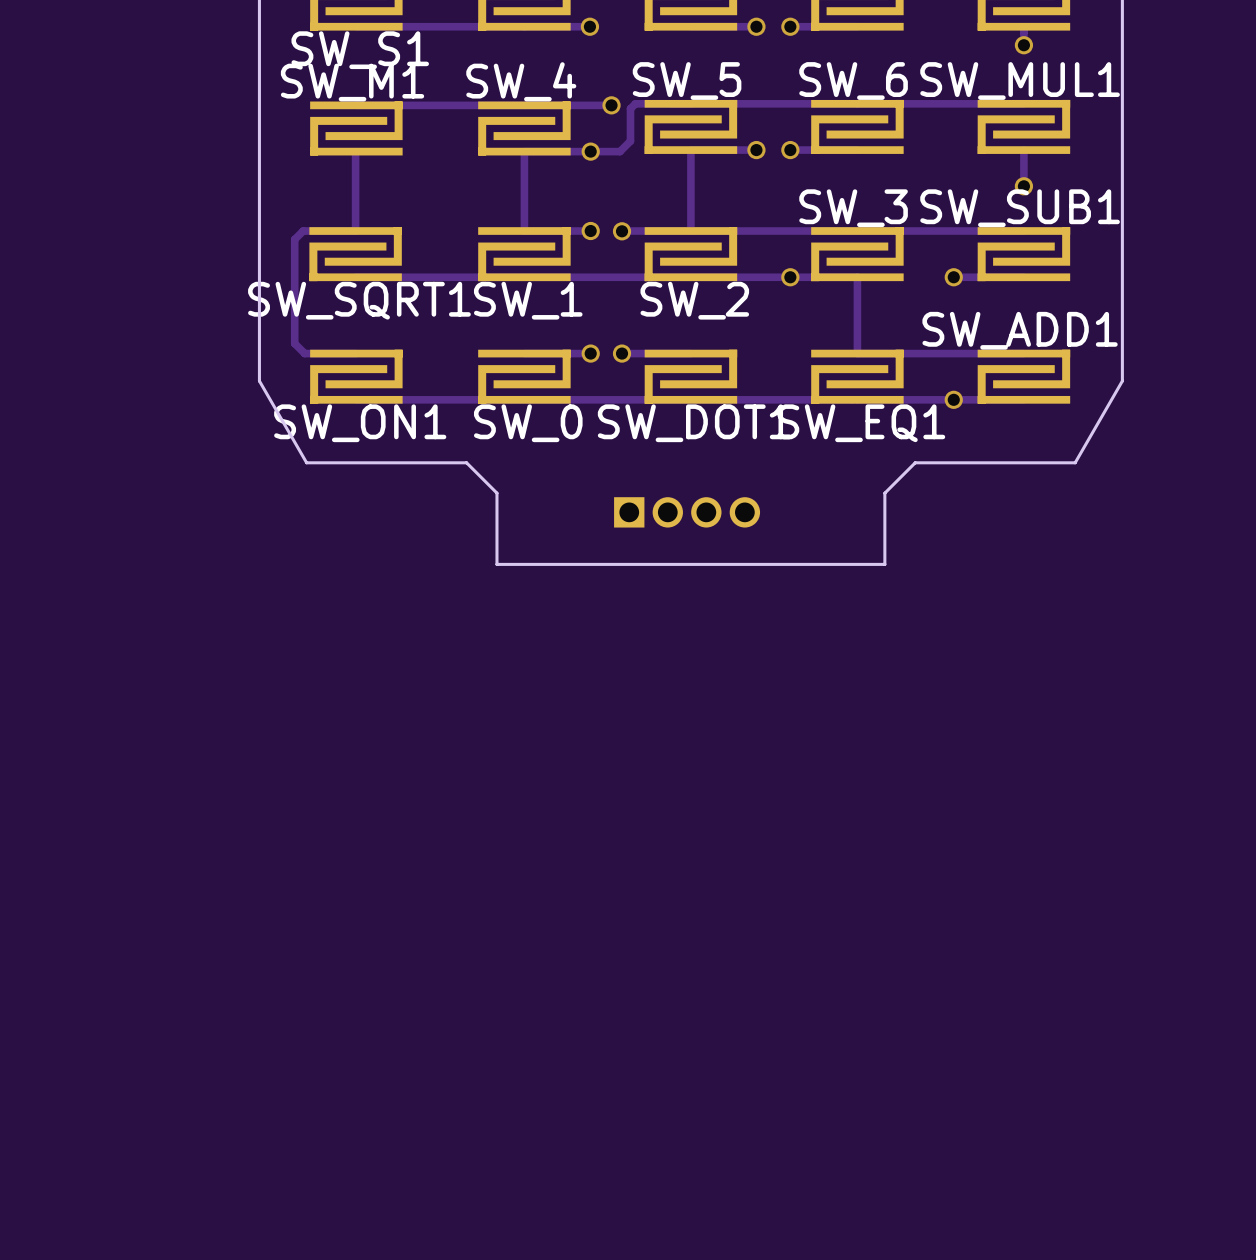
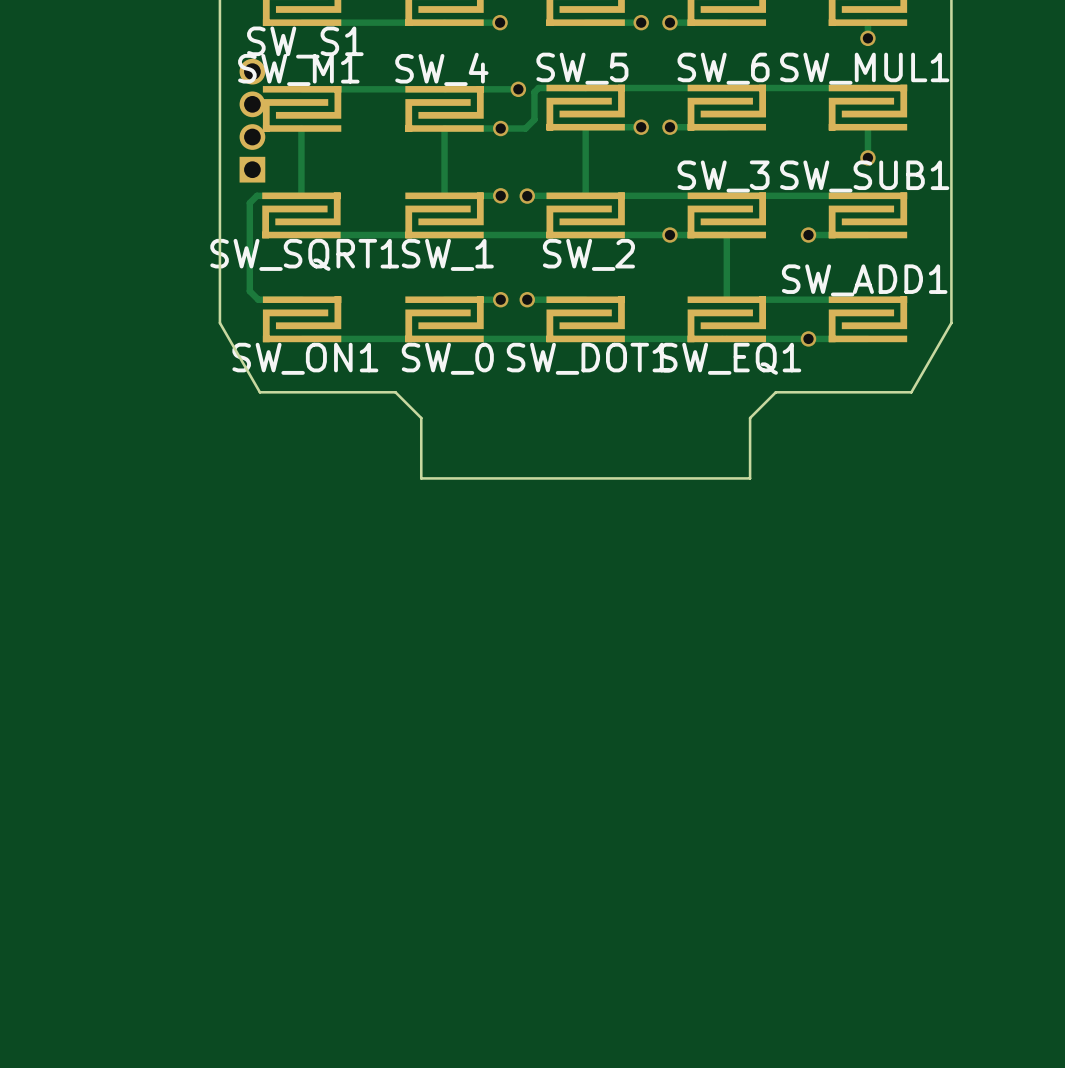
part rotation: 0° (687, 512) -> 90° counterclockwise (252, 120)
part position: (687, 512) -> (252, 120)

